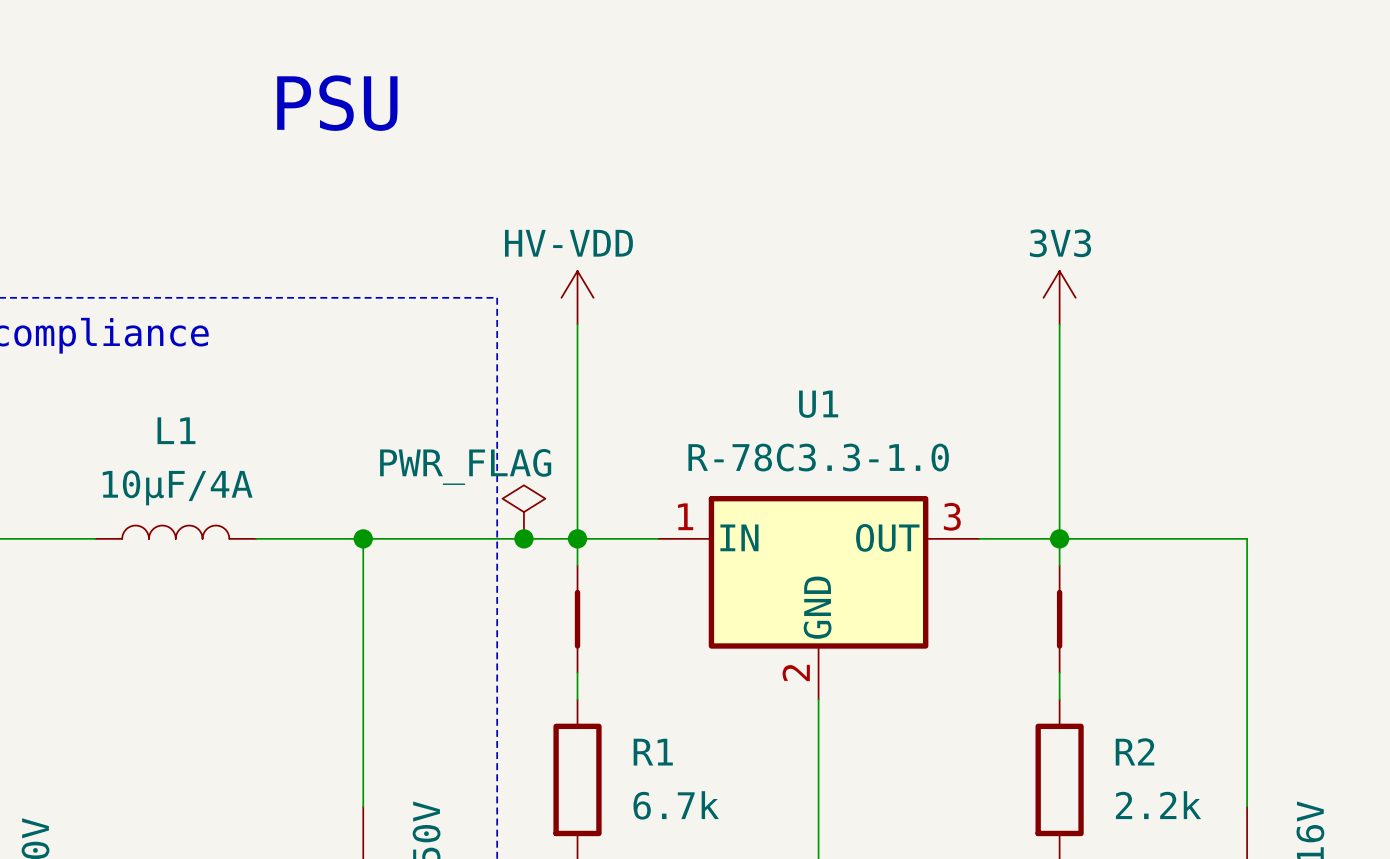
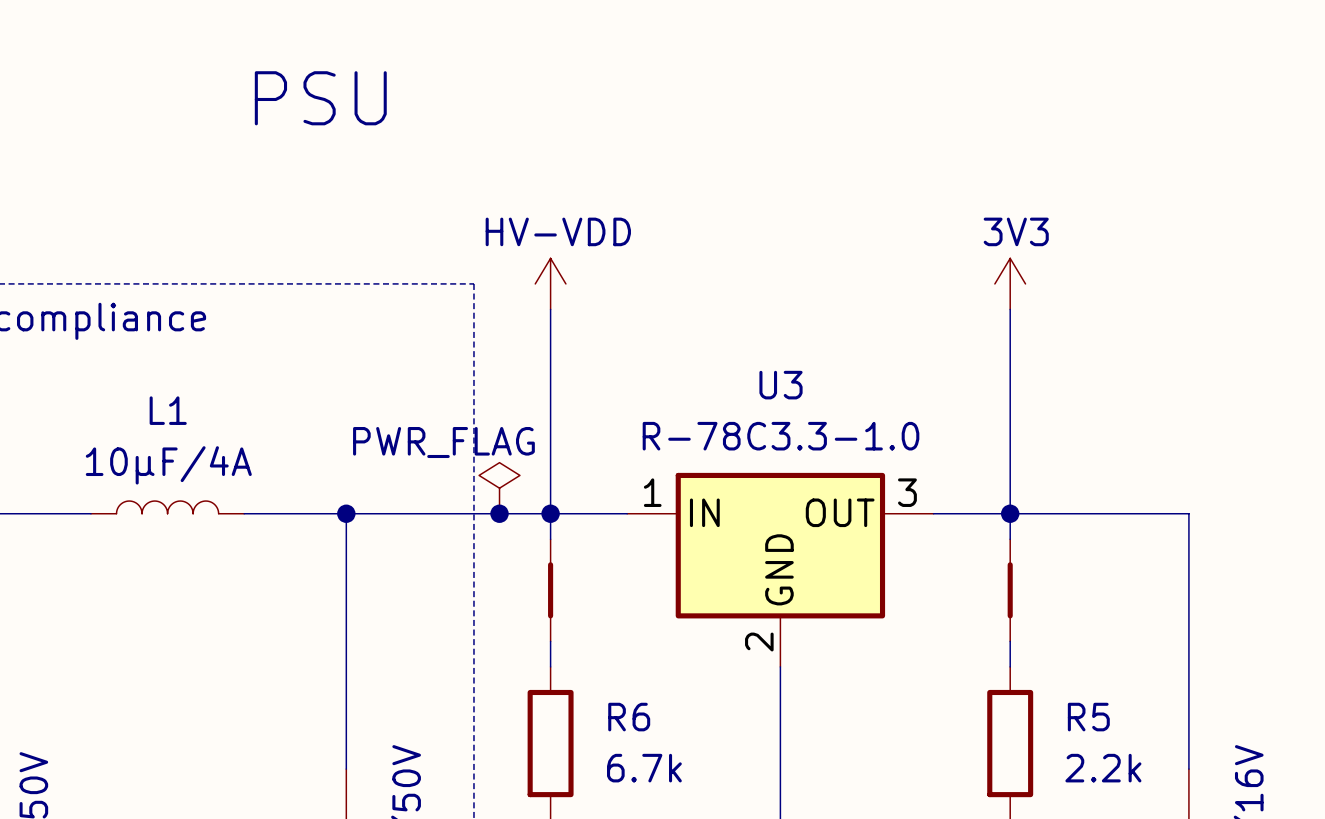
U1 name: U1 (818, 404) -> U3 (781, 385)
R2 name: R2 (1135, 751) -> R5 (1088, 717)
R1 name: R1 (653, 752) -> R6 (629, 717)

